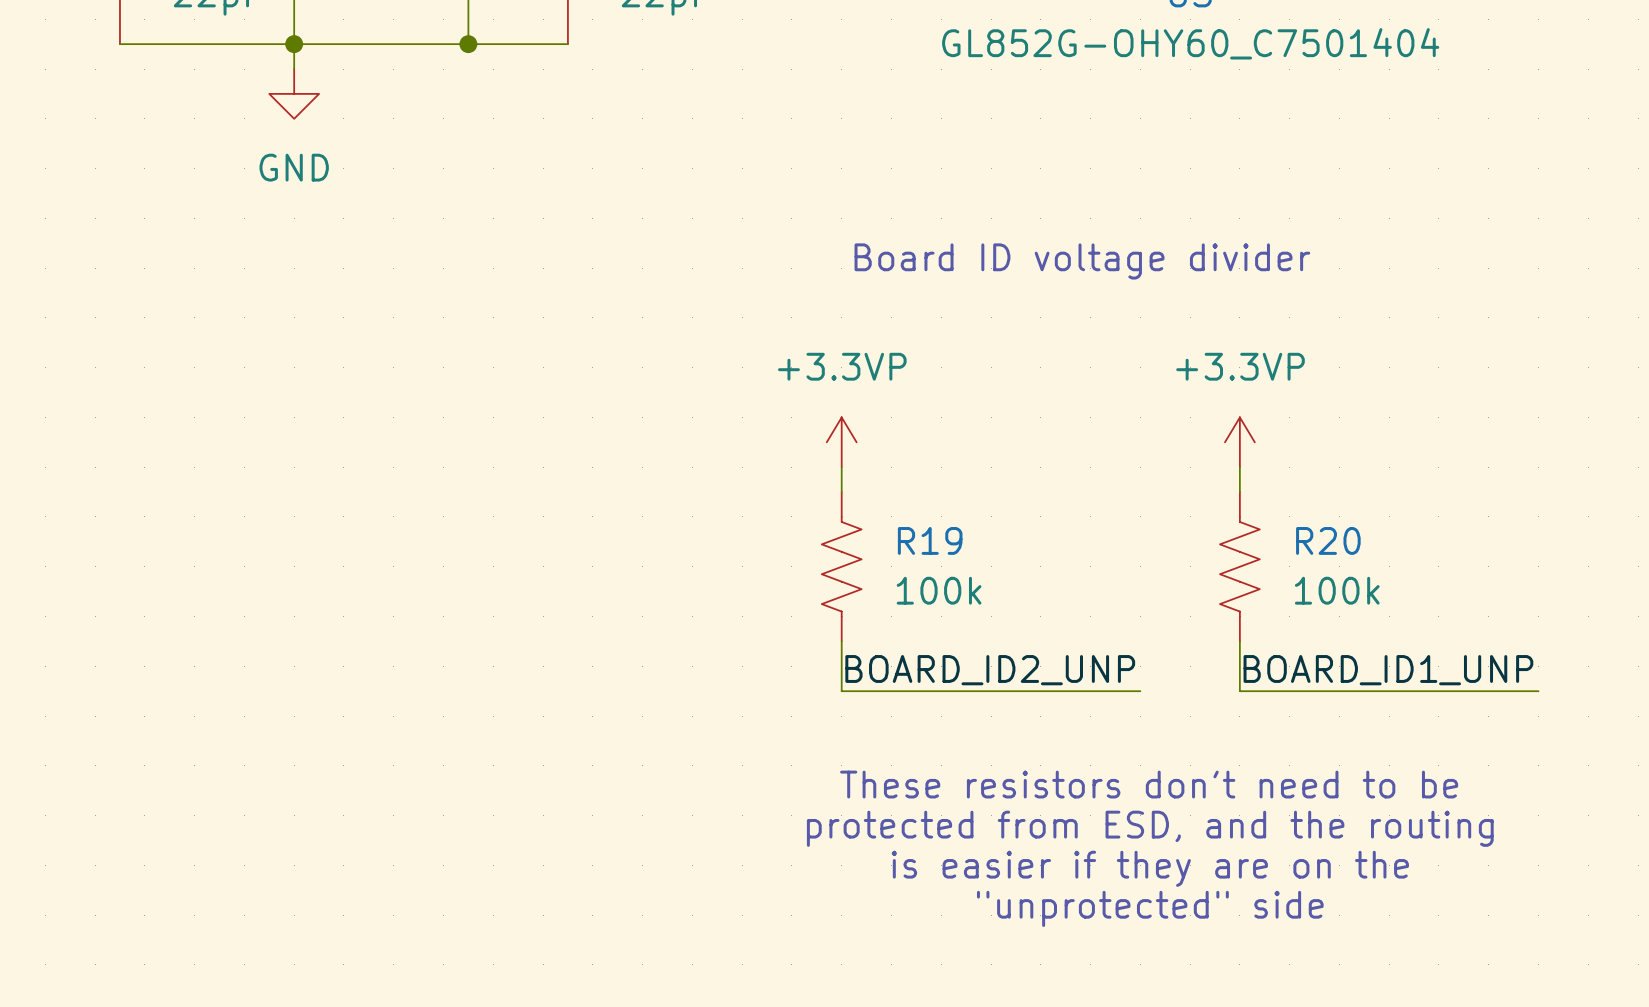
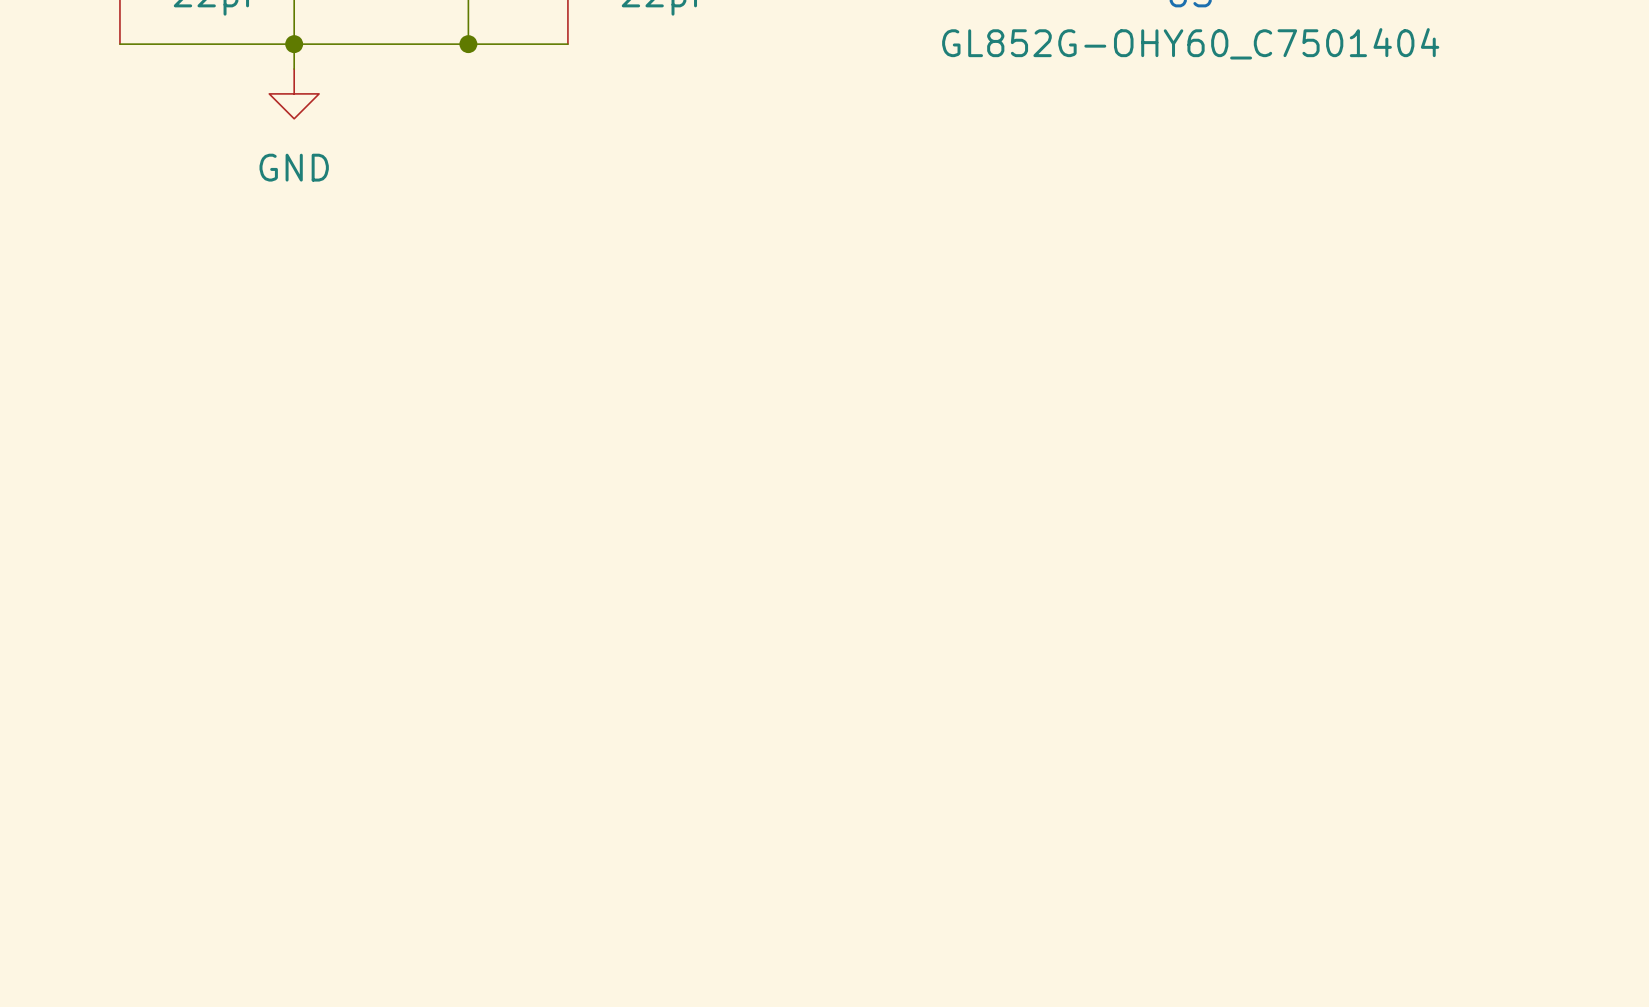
text: Board ID voltage divider (1082, 261) -> none
power symbol: +3.3VP (841, 442) -> none
power symbol: +3.3VP (1239, 442) -> none
wire: (841, 467) (841, 492) -> none
wire: (1239, 467) (1239, 492) -> none
R19: 100k (841, 566) -> none
R20: 100k (1239, 566) -> none
wire: (841, 641) (841, 691) (1140, 691) -> none
wire: (1239, 641) (1239, 691) (1538, 691) -> none
label: BOARD_ID2_UNP (990, 670) -> none
label: BOARD_ID1_UNP (1388, 670) -> none
text: These resistors don't need to be (1149, 784) -> none
text: protected from ESD, and the routing (1150, 828) -> none
text: is easier if they are on the (1150, 868) -> none
text: "unprotected" side (1150, 908) -> none

